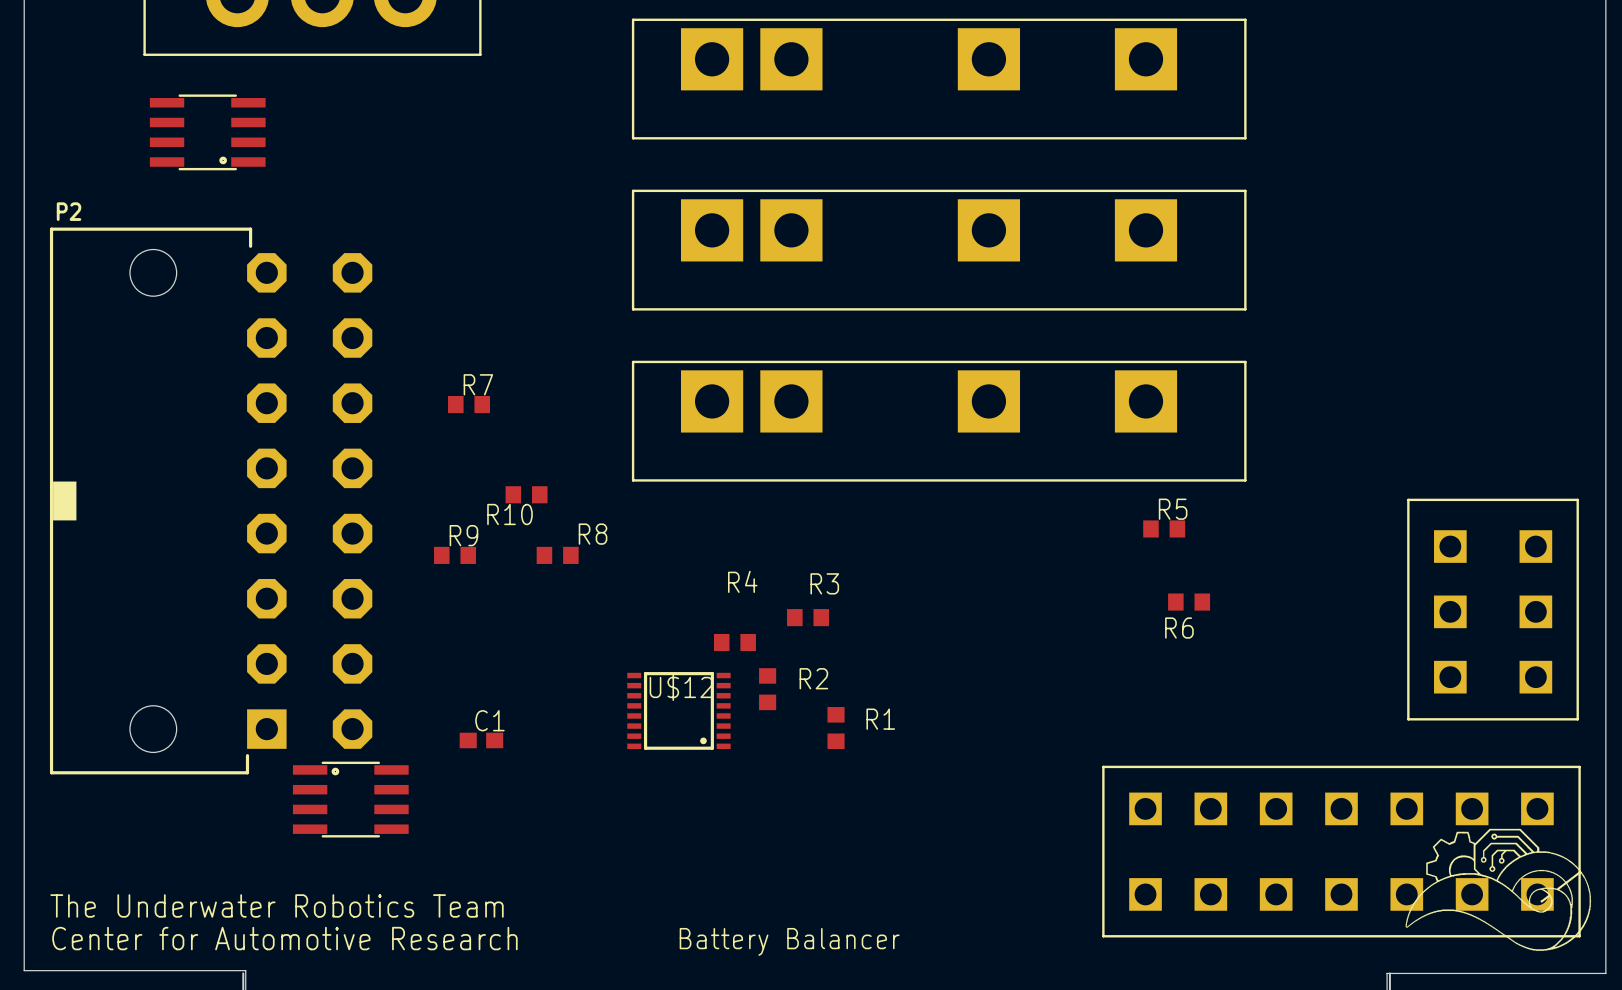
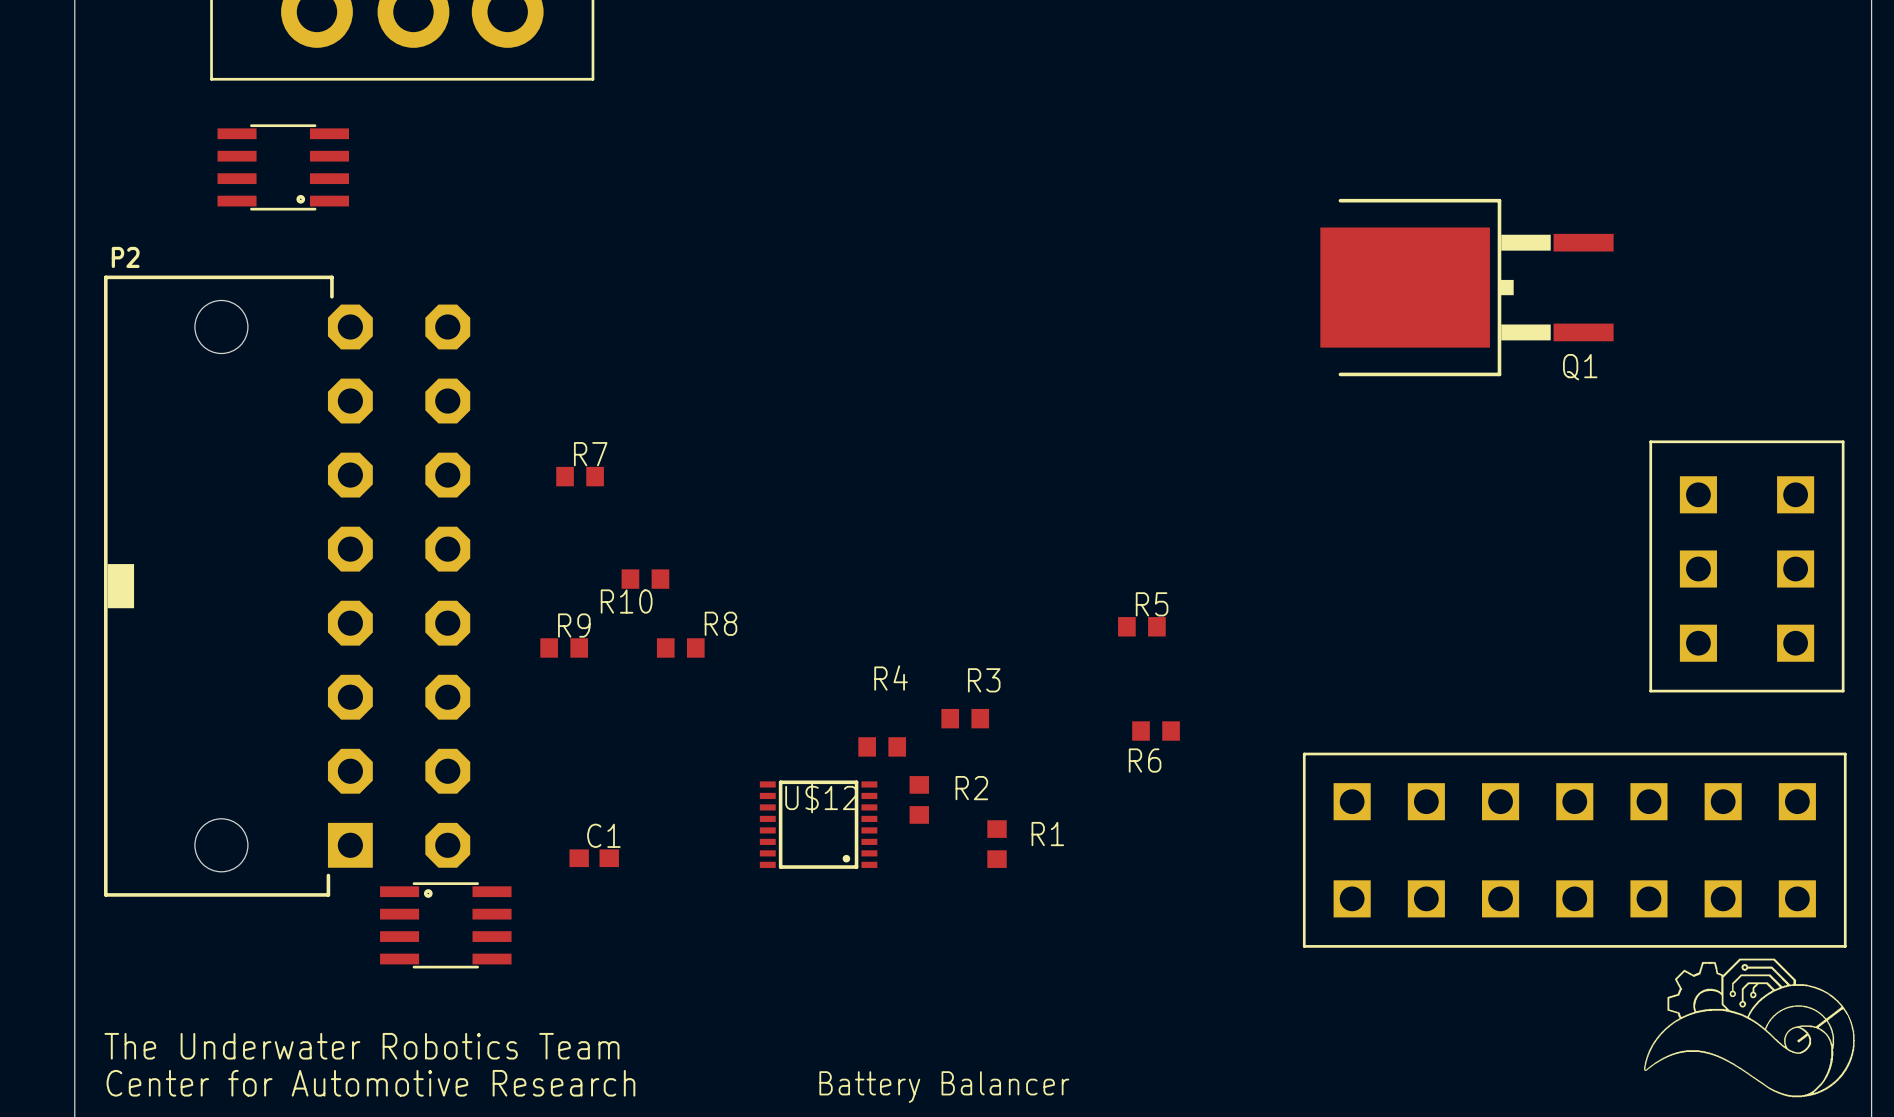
part: (939, 79) -> none
Q1: none -> (1466, 287)
part: (939, 250) -> none
part: (939, 421) -> none
R5 position: (1164, 528) -> (1141, 626)
R6 position: (1189, 602) -> (1156, 731)
part position: (1493, 609) -> (1746, 566)
part position: (1341, 851) -> (1574, 850)

